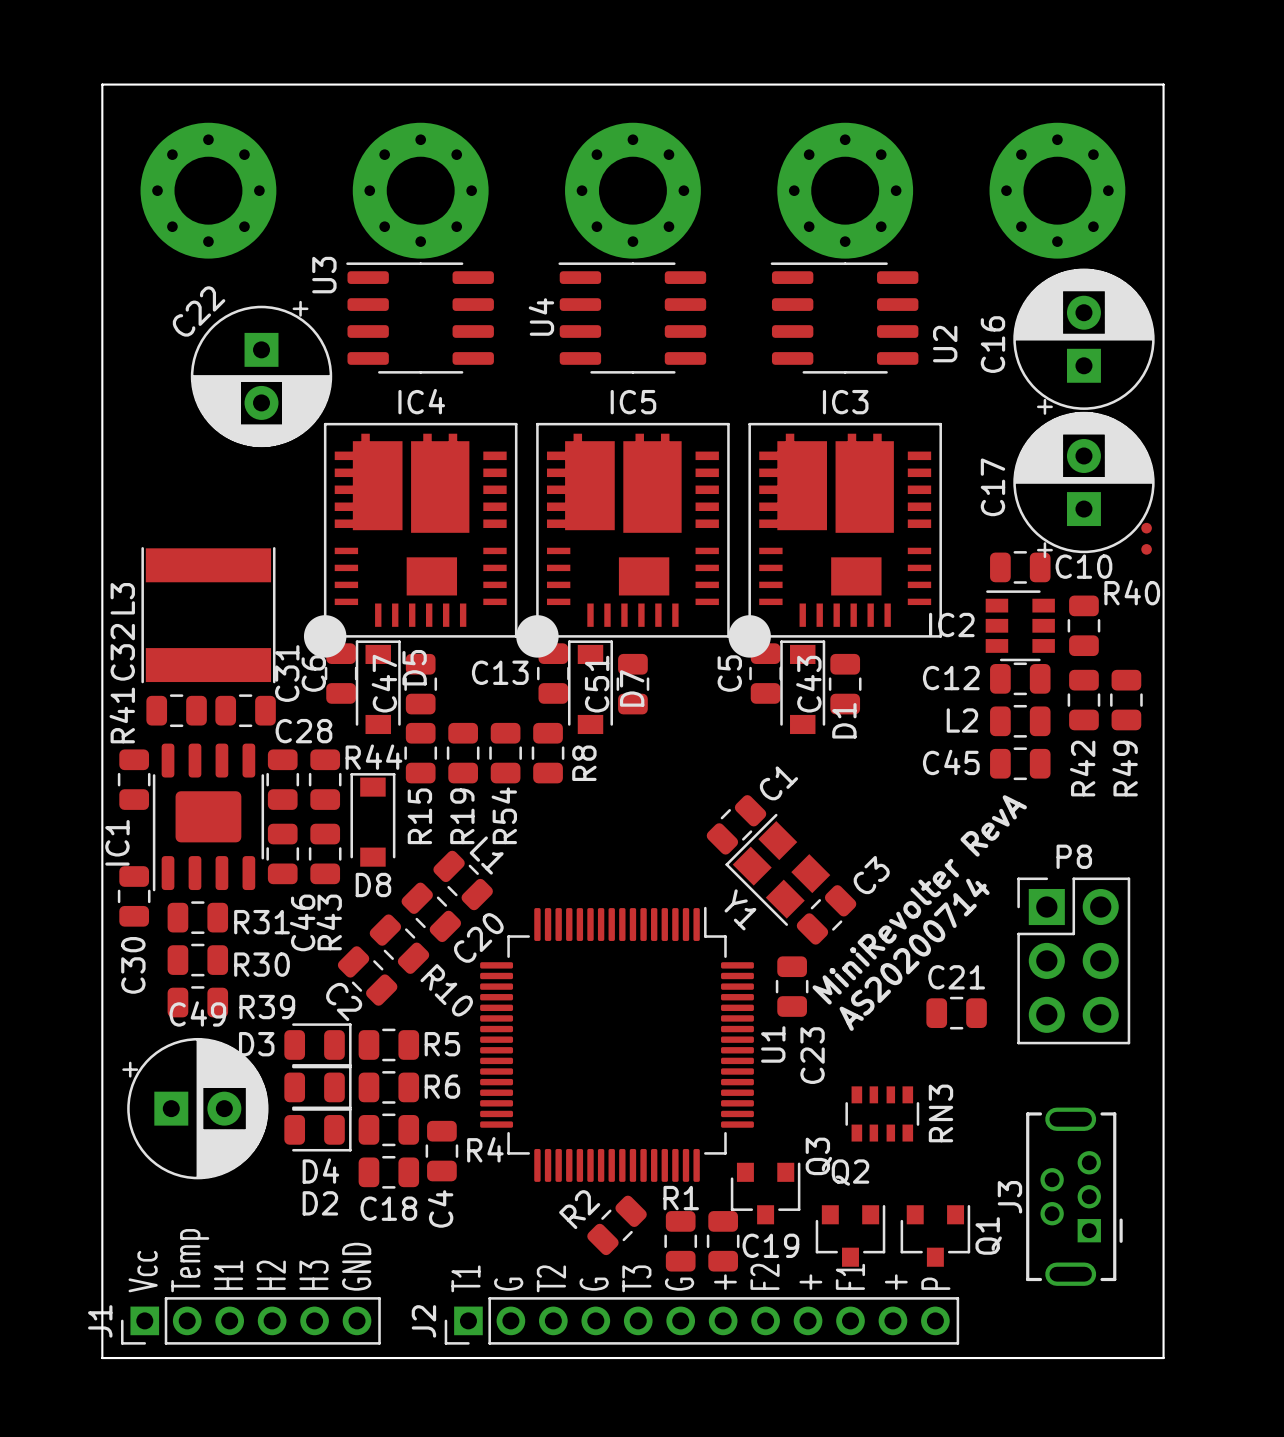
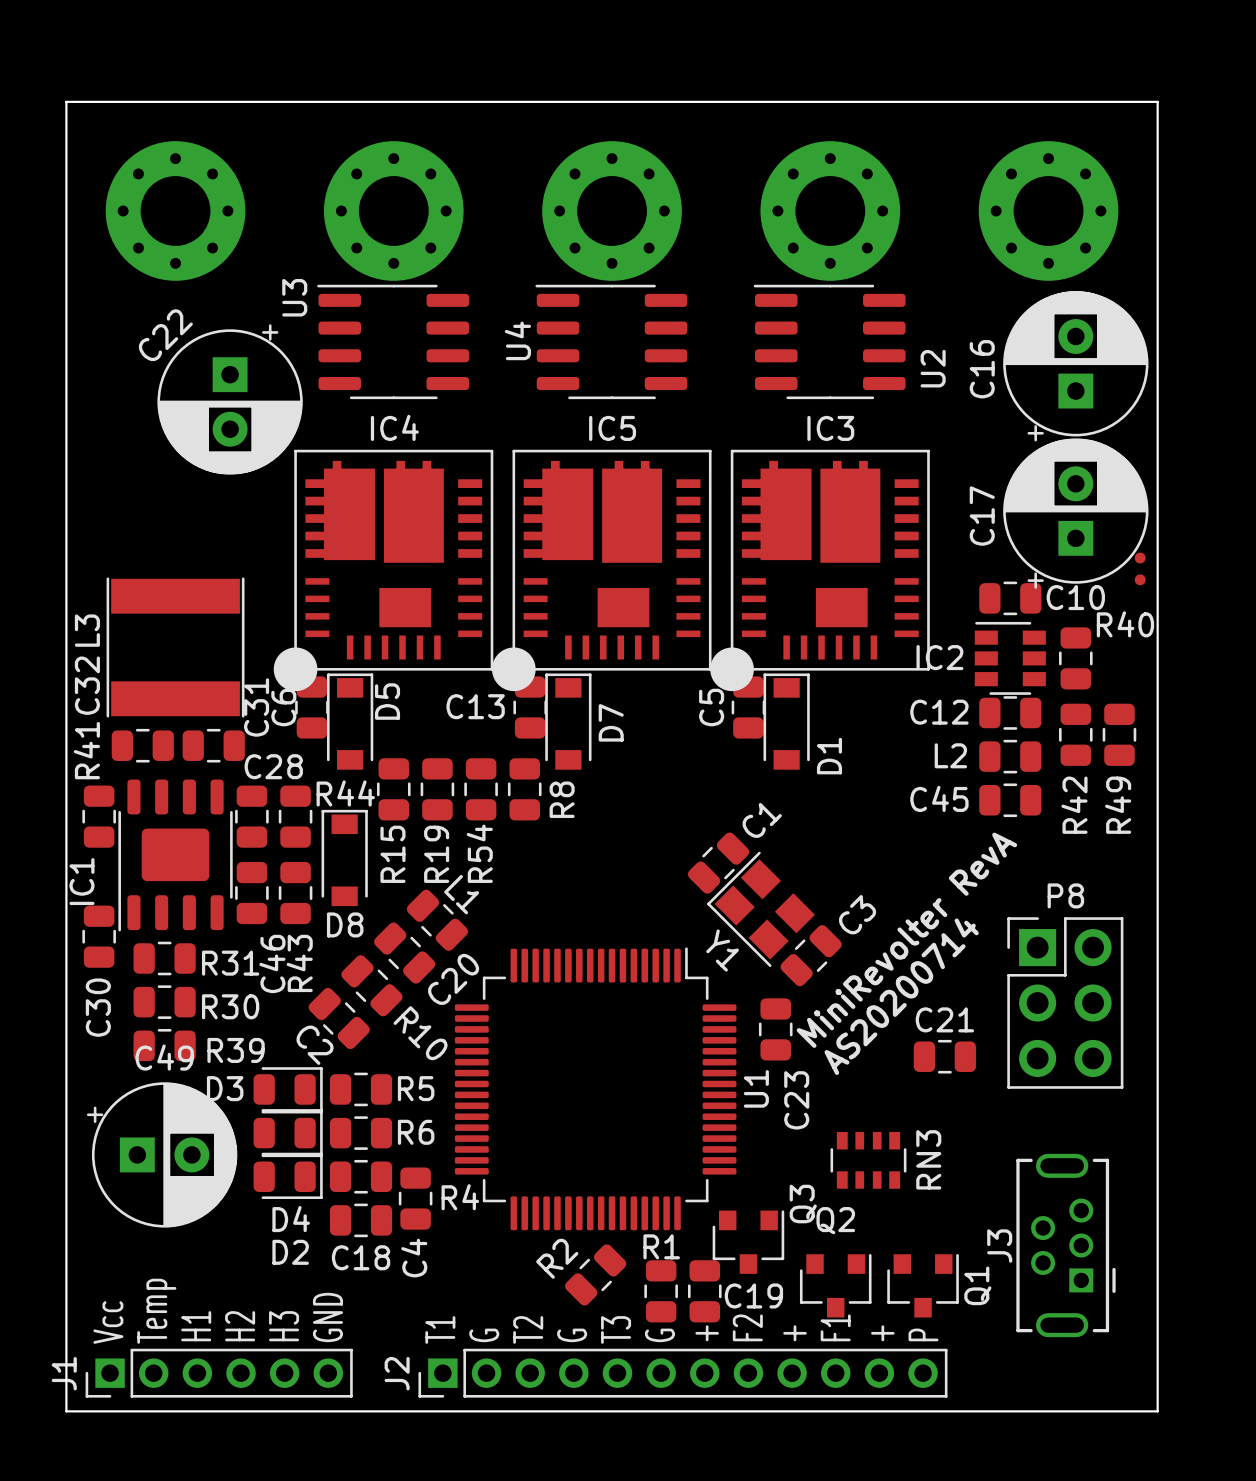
C47: (420, 684) -> none
C51: (632, 684) -> none
C43: (845, 684) -> none

